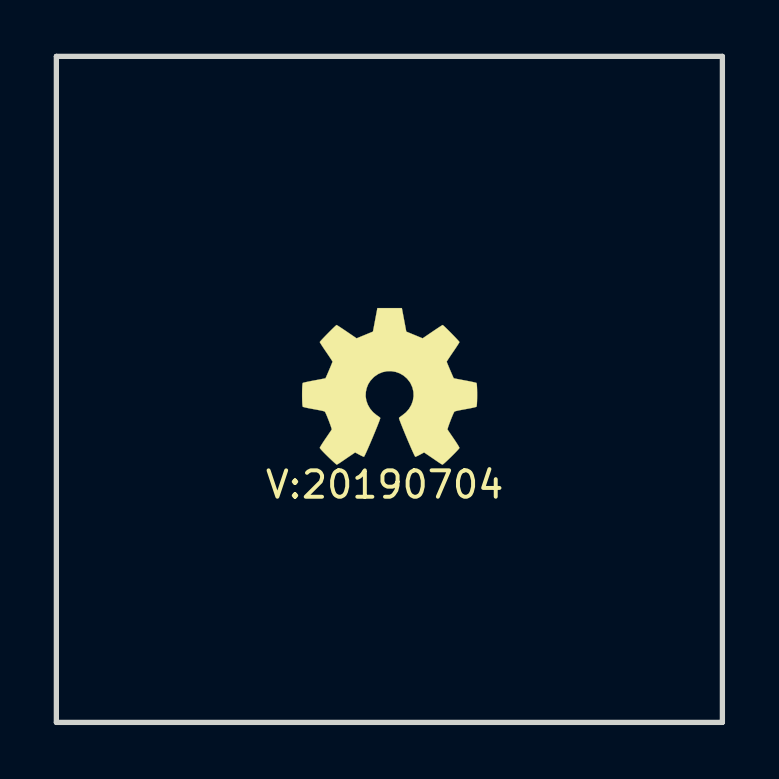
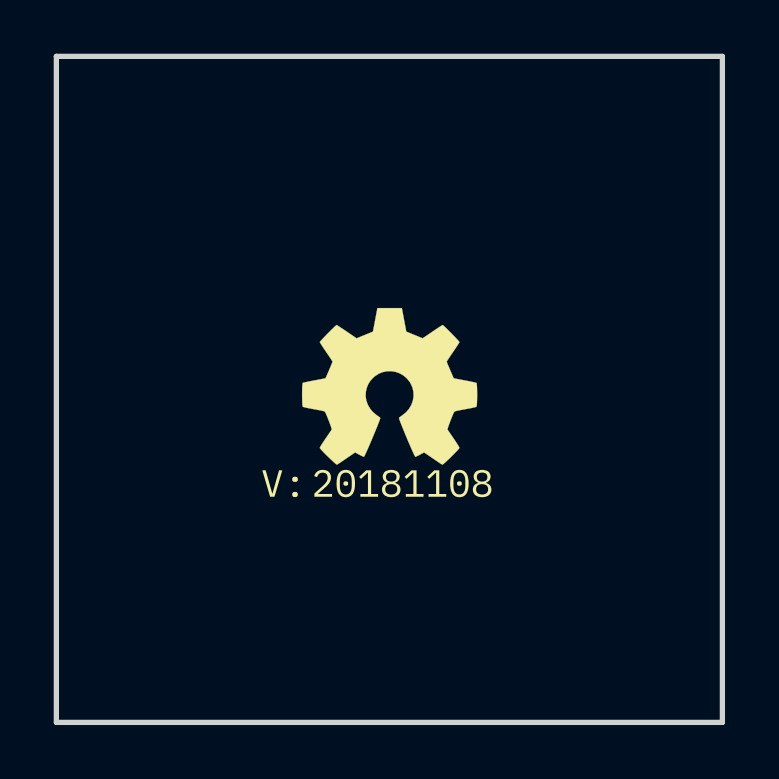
drawing shape: [266, 467, 502, 499] -> [262, 469, 492, 498]

